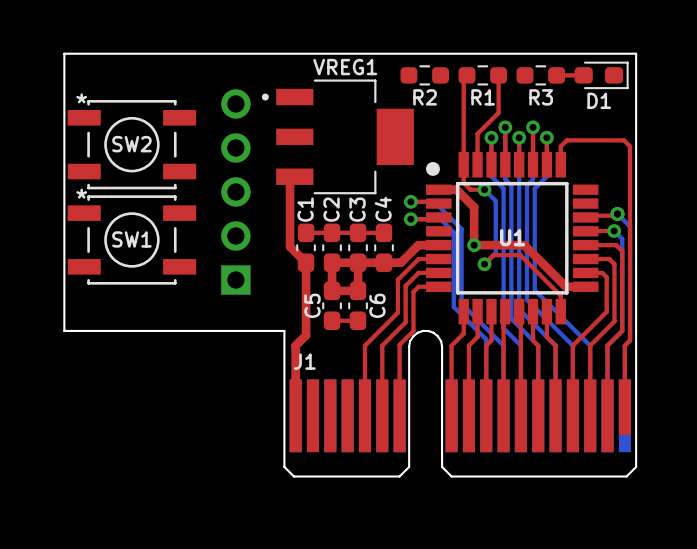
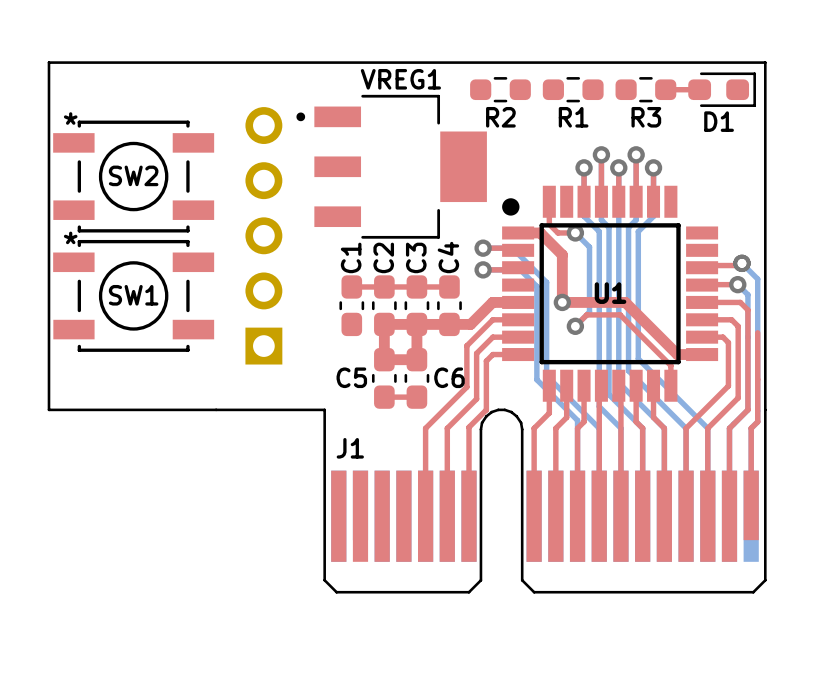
top track: (466, 75) (463, 78) (463, 164) -> none
top track: (498, 75) (498, 112) (477, 133) (477, 164) -> none
top track: (560, 164) (560, 146) (566, 140) (623, 140) (630, 146) (630, 269) -> none
top track: (294, 176) (290, 181) (290, 246) (306, 262) (306, 335) (295, 345) (295, 415) -> none
C5 name rotation: 0° (312, 305) -> 90° clockwise (351, 377)
C6 name rotation: 0° (377, 305) -> 90° clockwise (449, 377)

